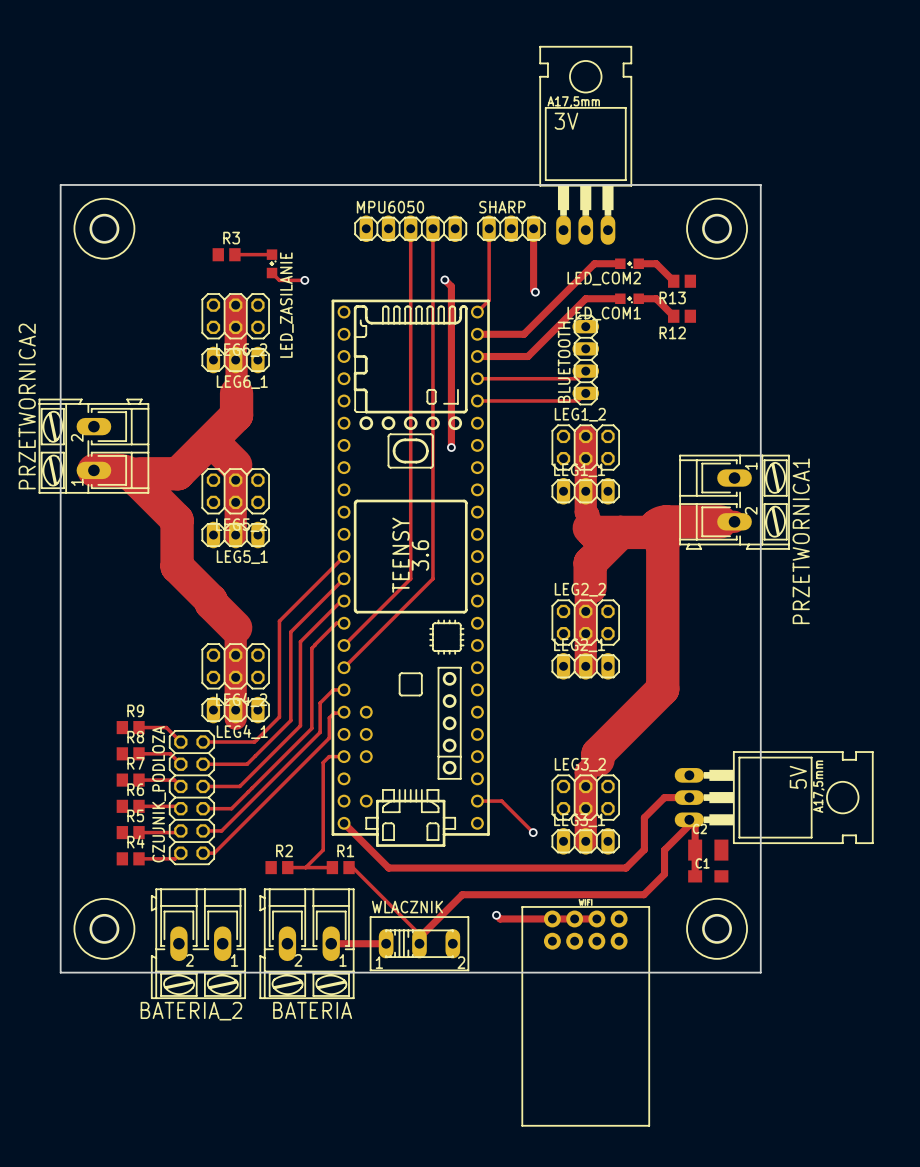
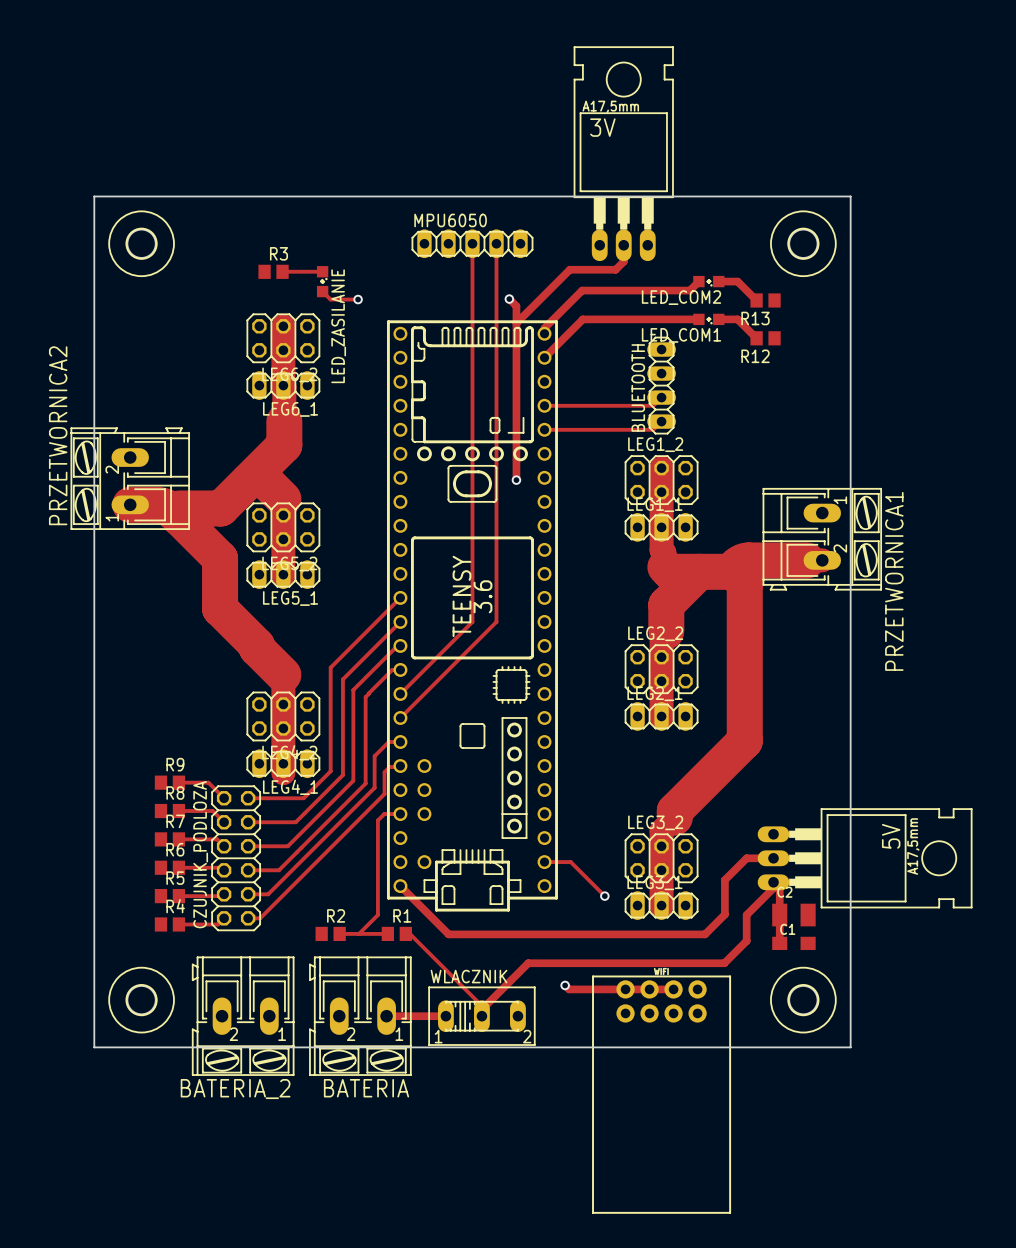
3V position: (585, 145) -> (623, 153)
track: (489, 228) (489, 300) (477, 312) -> none
SHARP: (511, 228) -> none
track: (533, 228) (533, 290) (535, 292) -> none
track: none -> (623, 245) (623, 261) (615, 269) (569, 269) (516, 323)
track: (620, 263) (594, 263) (523, 334) (477, 334) -> (698, 281) (689, 290) (582, 290) (544, 328) (544, 333)
via: (535, 292) -> none
track: (585, 298) (527, 356) (477, 356) -> (661, 319) (582, 319) (544, 357)

